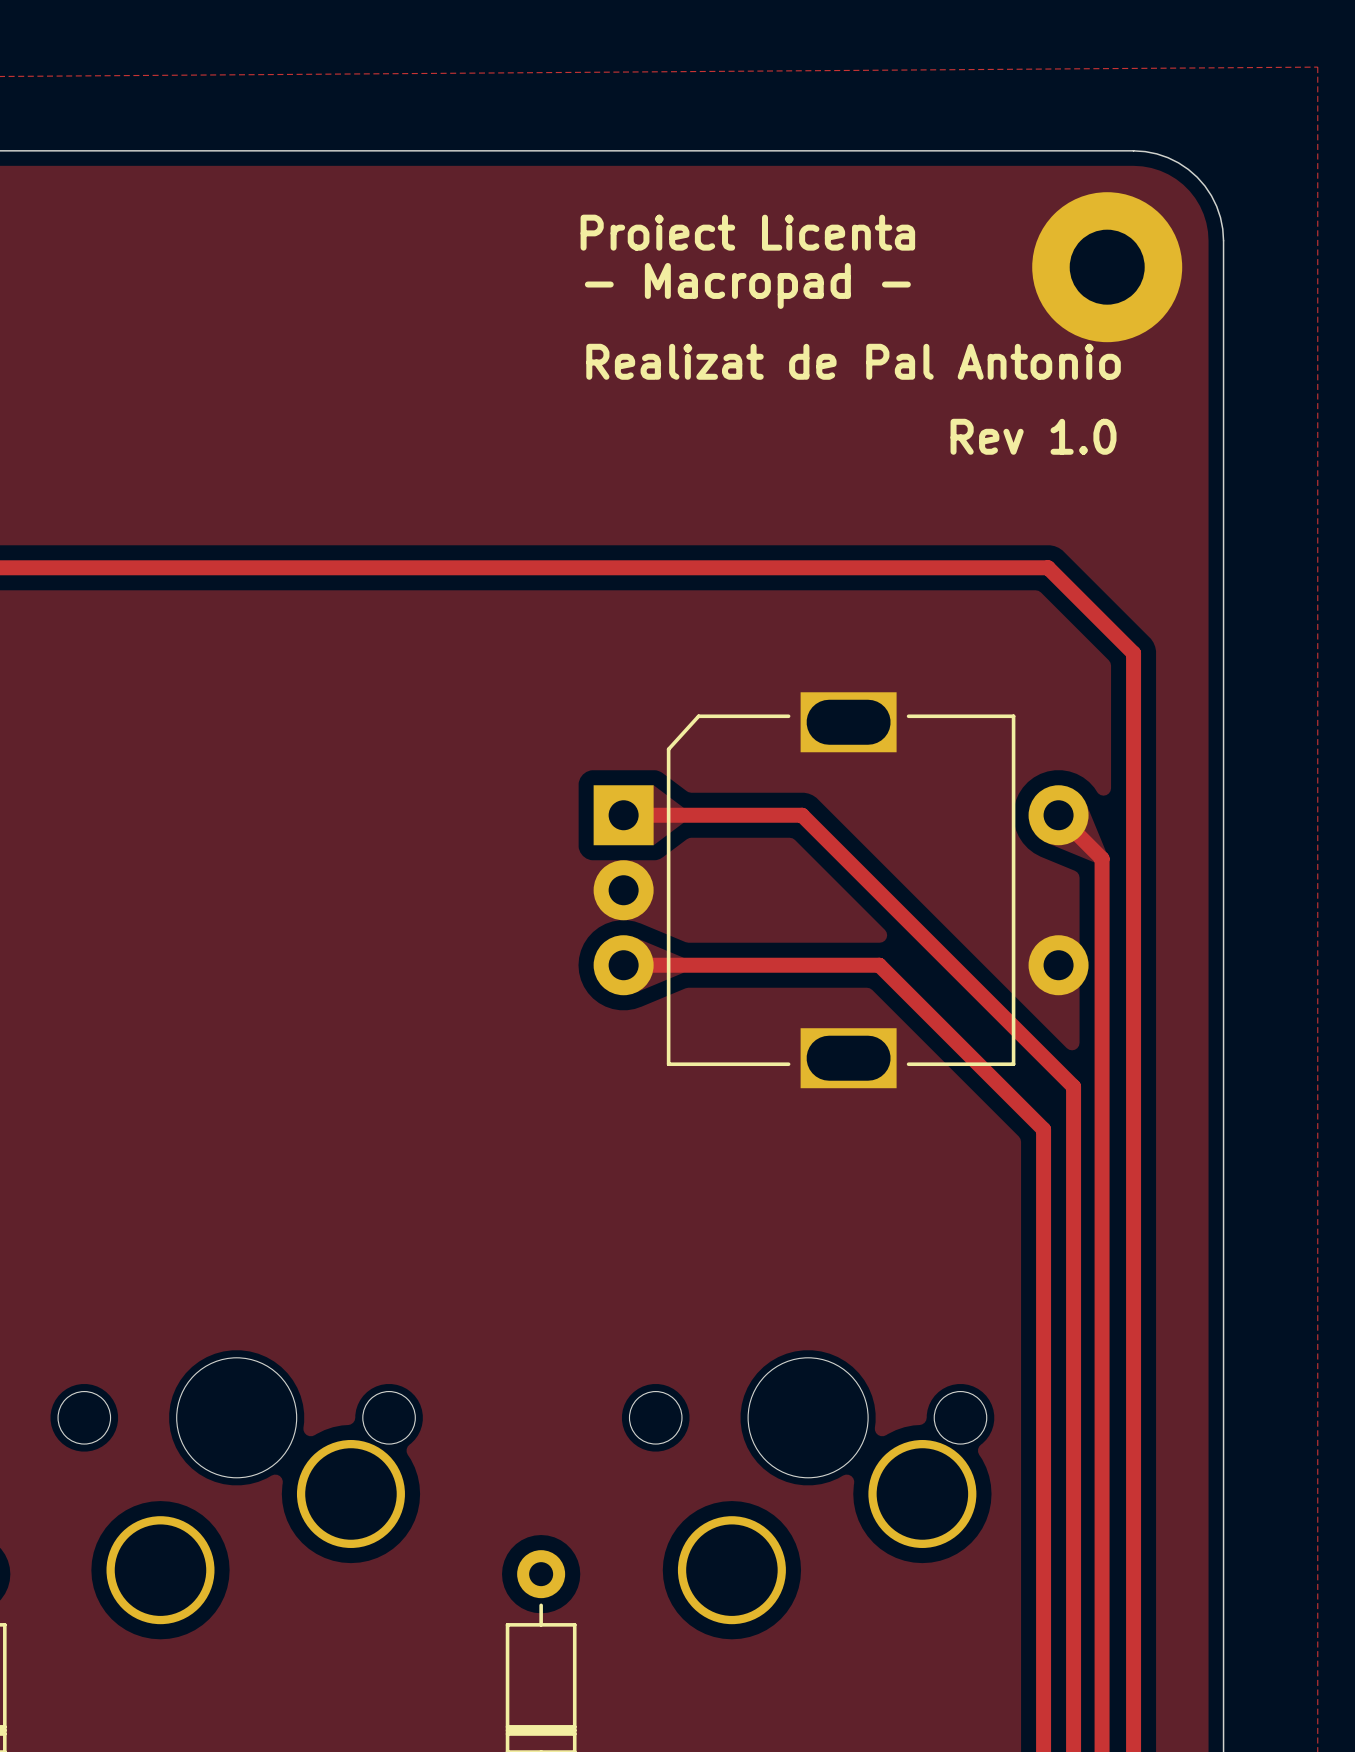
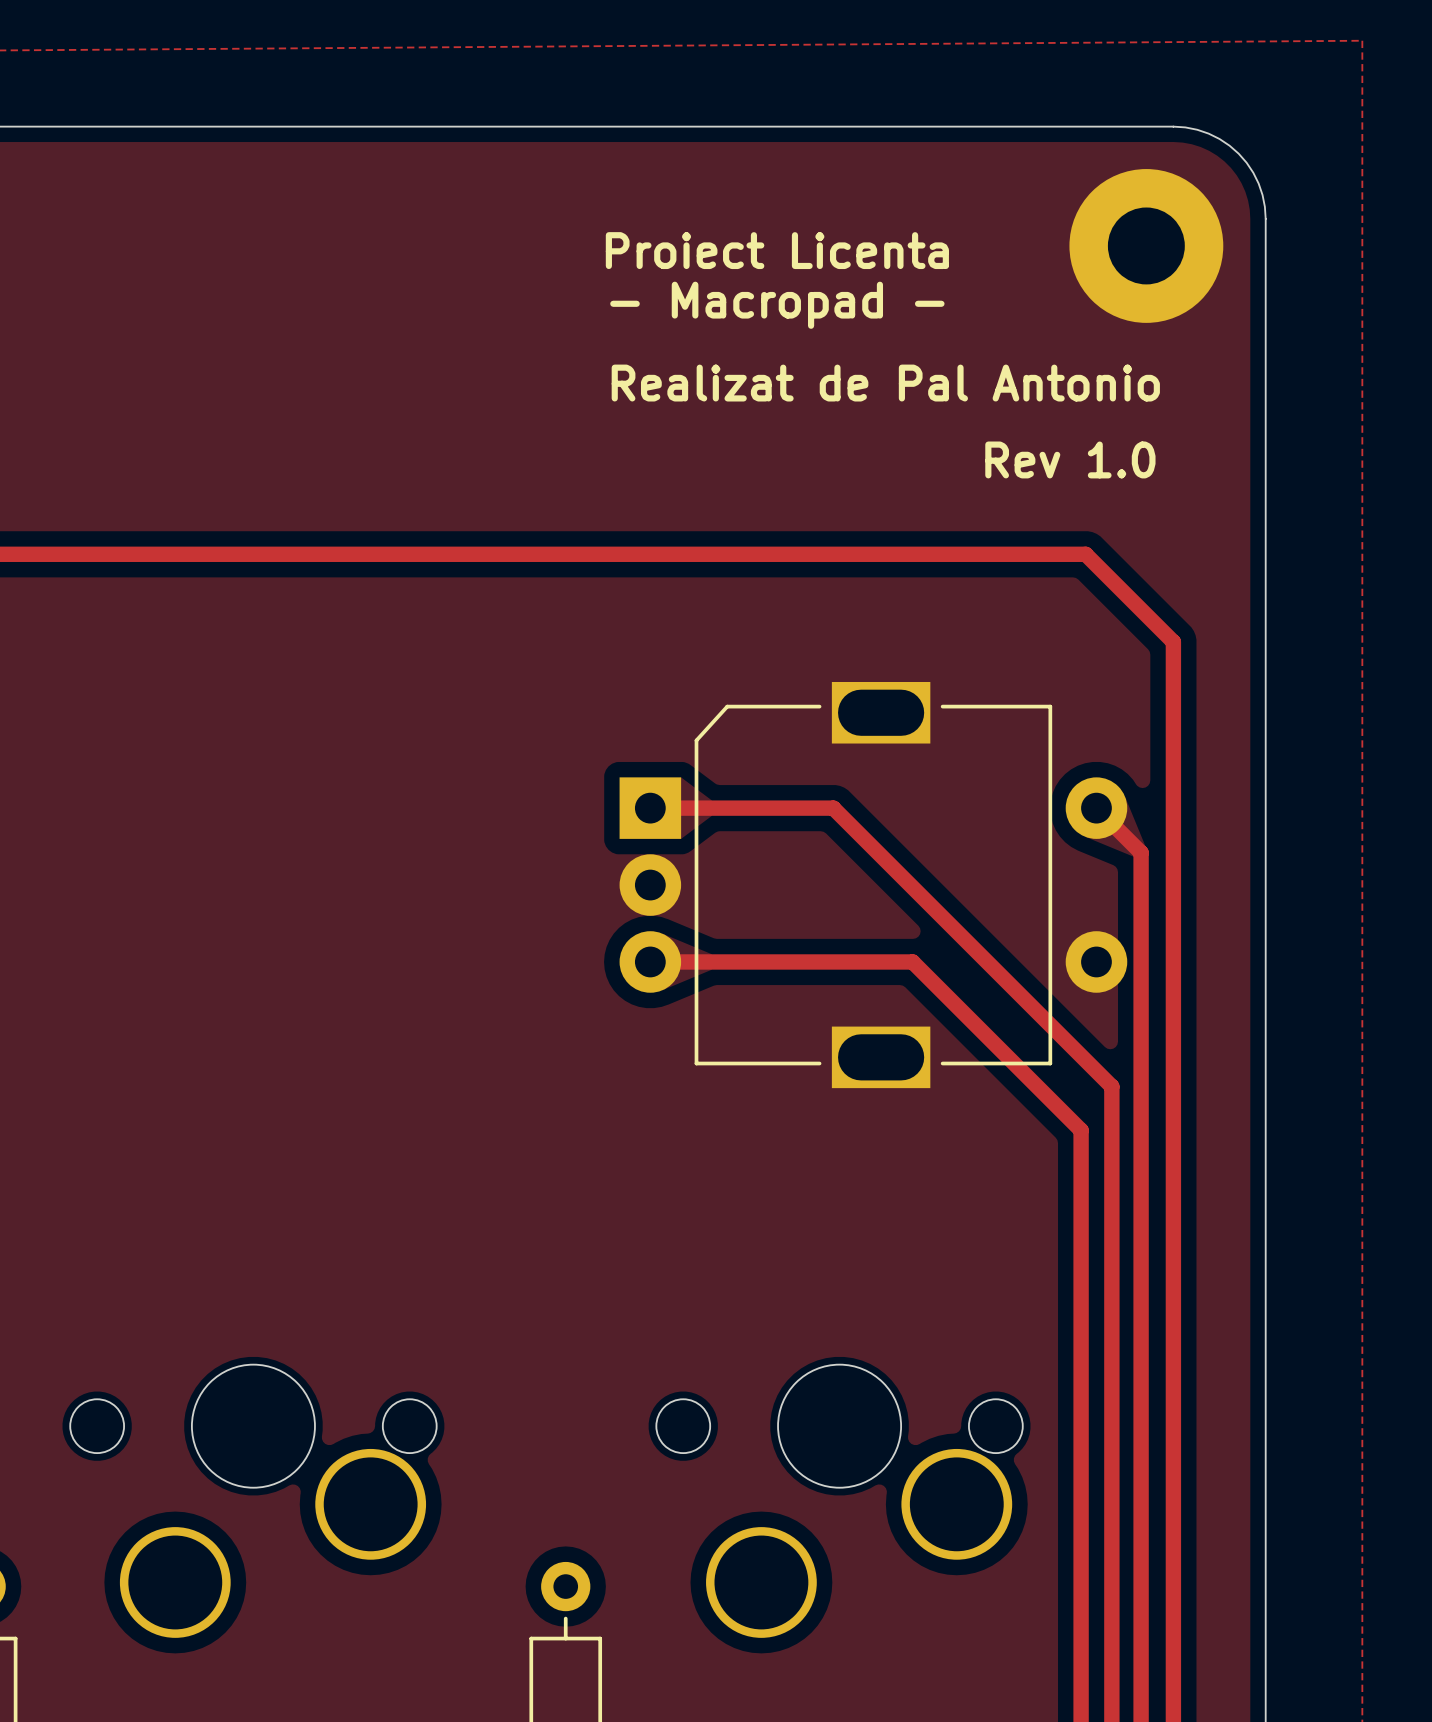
text position: Proiect Licenta (747, 232) -> Proiect Licenta (777, 250)
text position: - Macropad - (747, 285) -> - Macropad - (777, 305)
text position: Realizat de Pal Antonio (853, 361) -> Realizat de Pal Antonio (885, 383)
text position: Rev 1.0 (1033, 436) -> Rev 1.0 (1070, 459)

